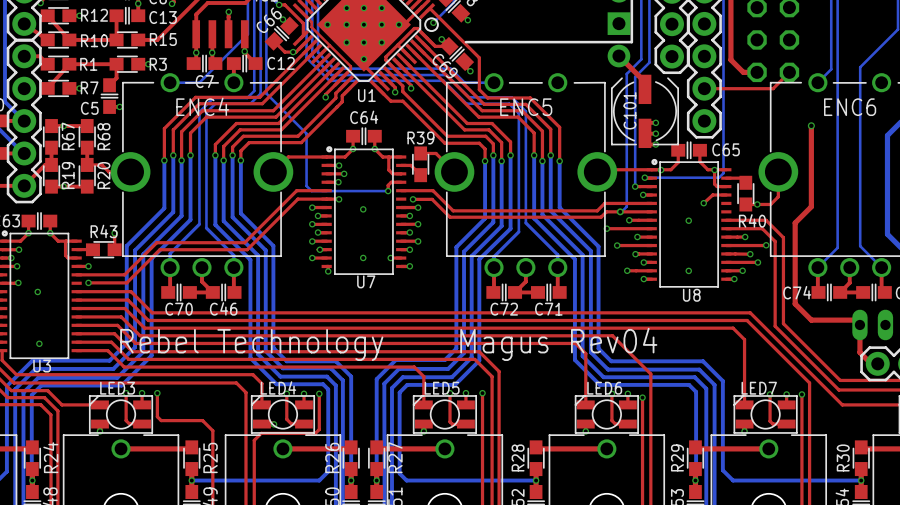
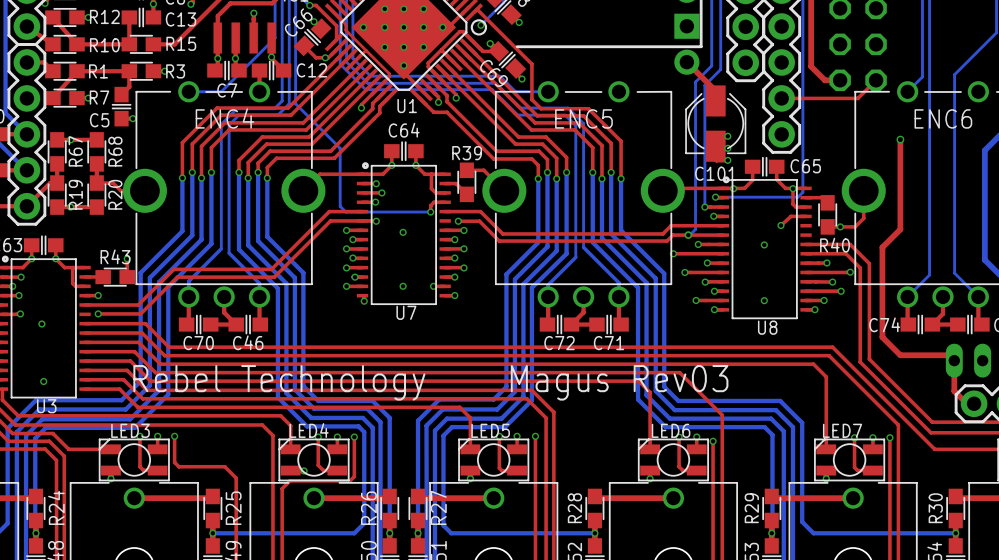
C101 footprint: [611, 74, 679, 149] -> [685, 85, 747, 162]
C101 name rotation: 0° (629, 110) -> 90° clockwise (715, 173)
C101 name position: C101 (629, 110) -> C101 (715, 173)
text: Magus Rev04 (558, 344) -> Magus Rev03 (619, 382)

